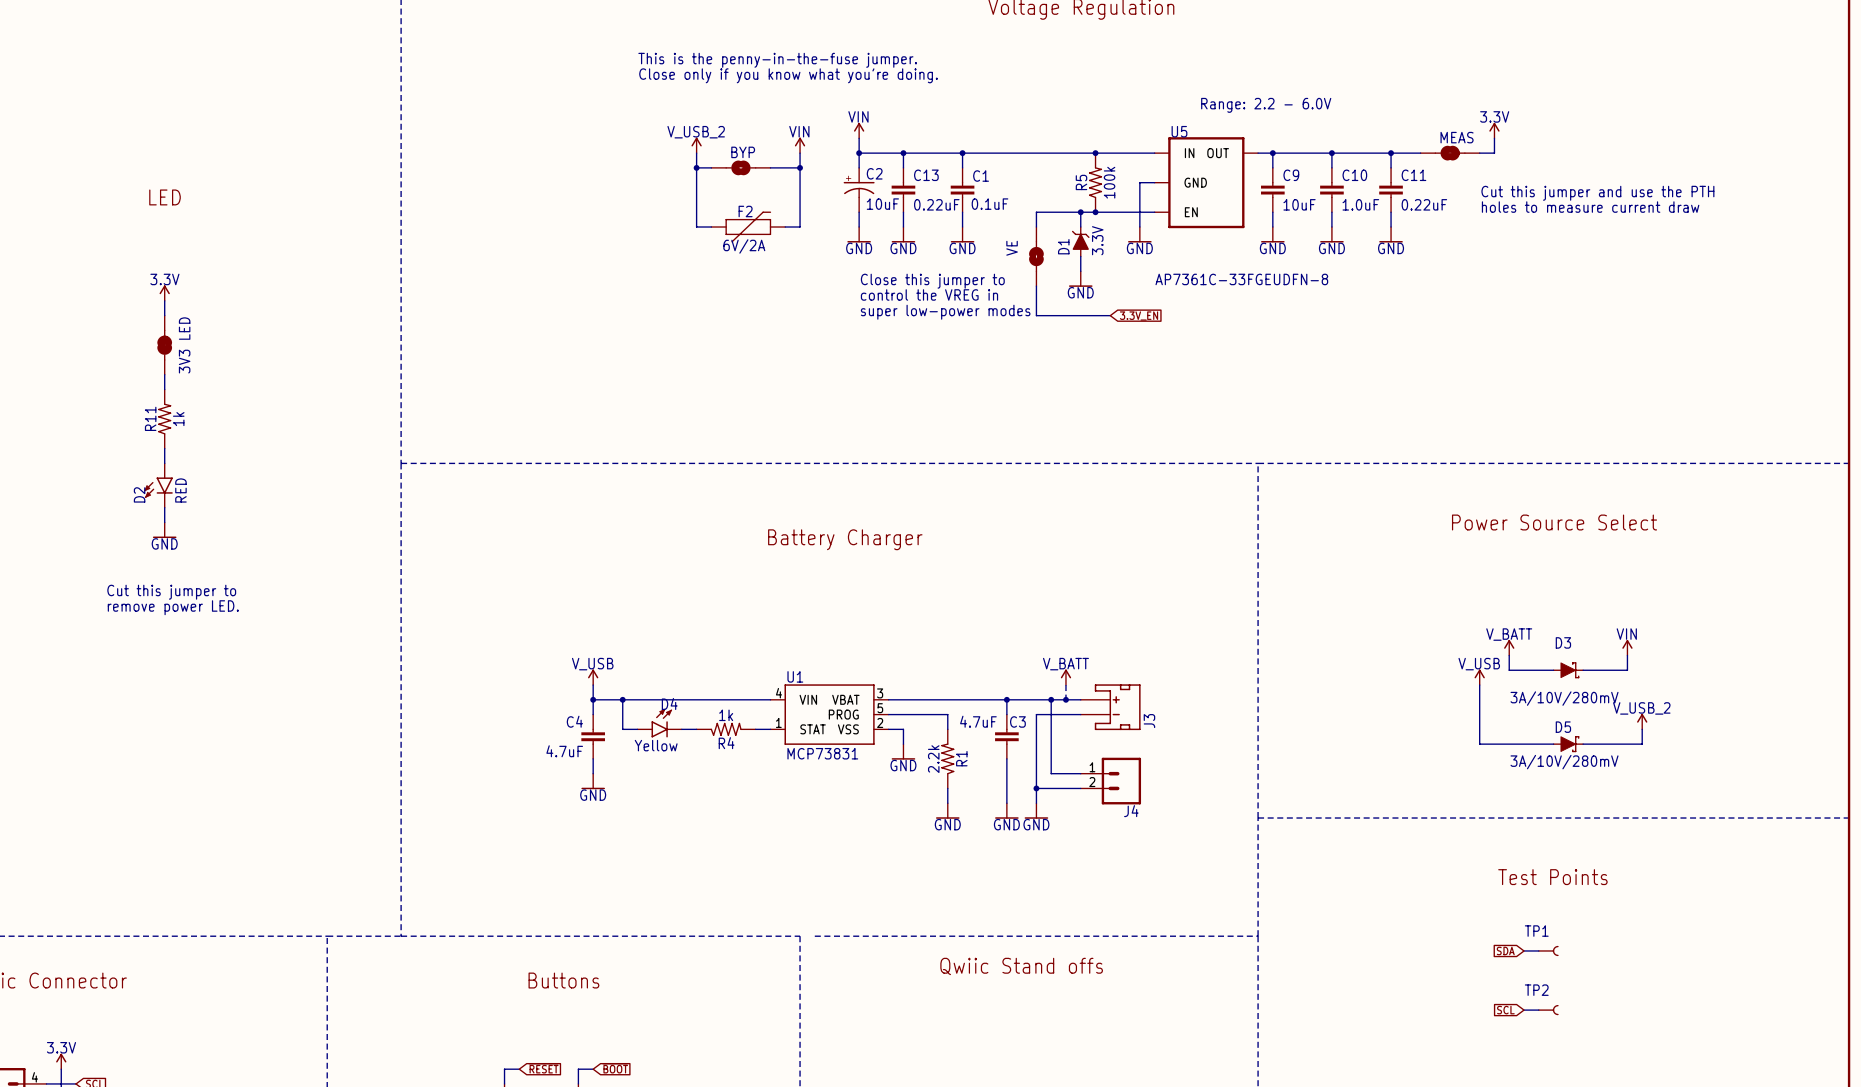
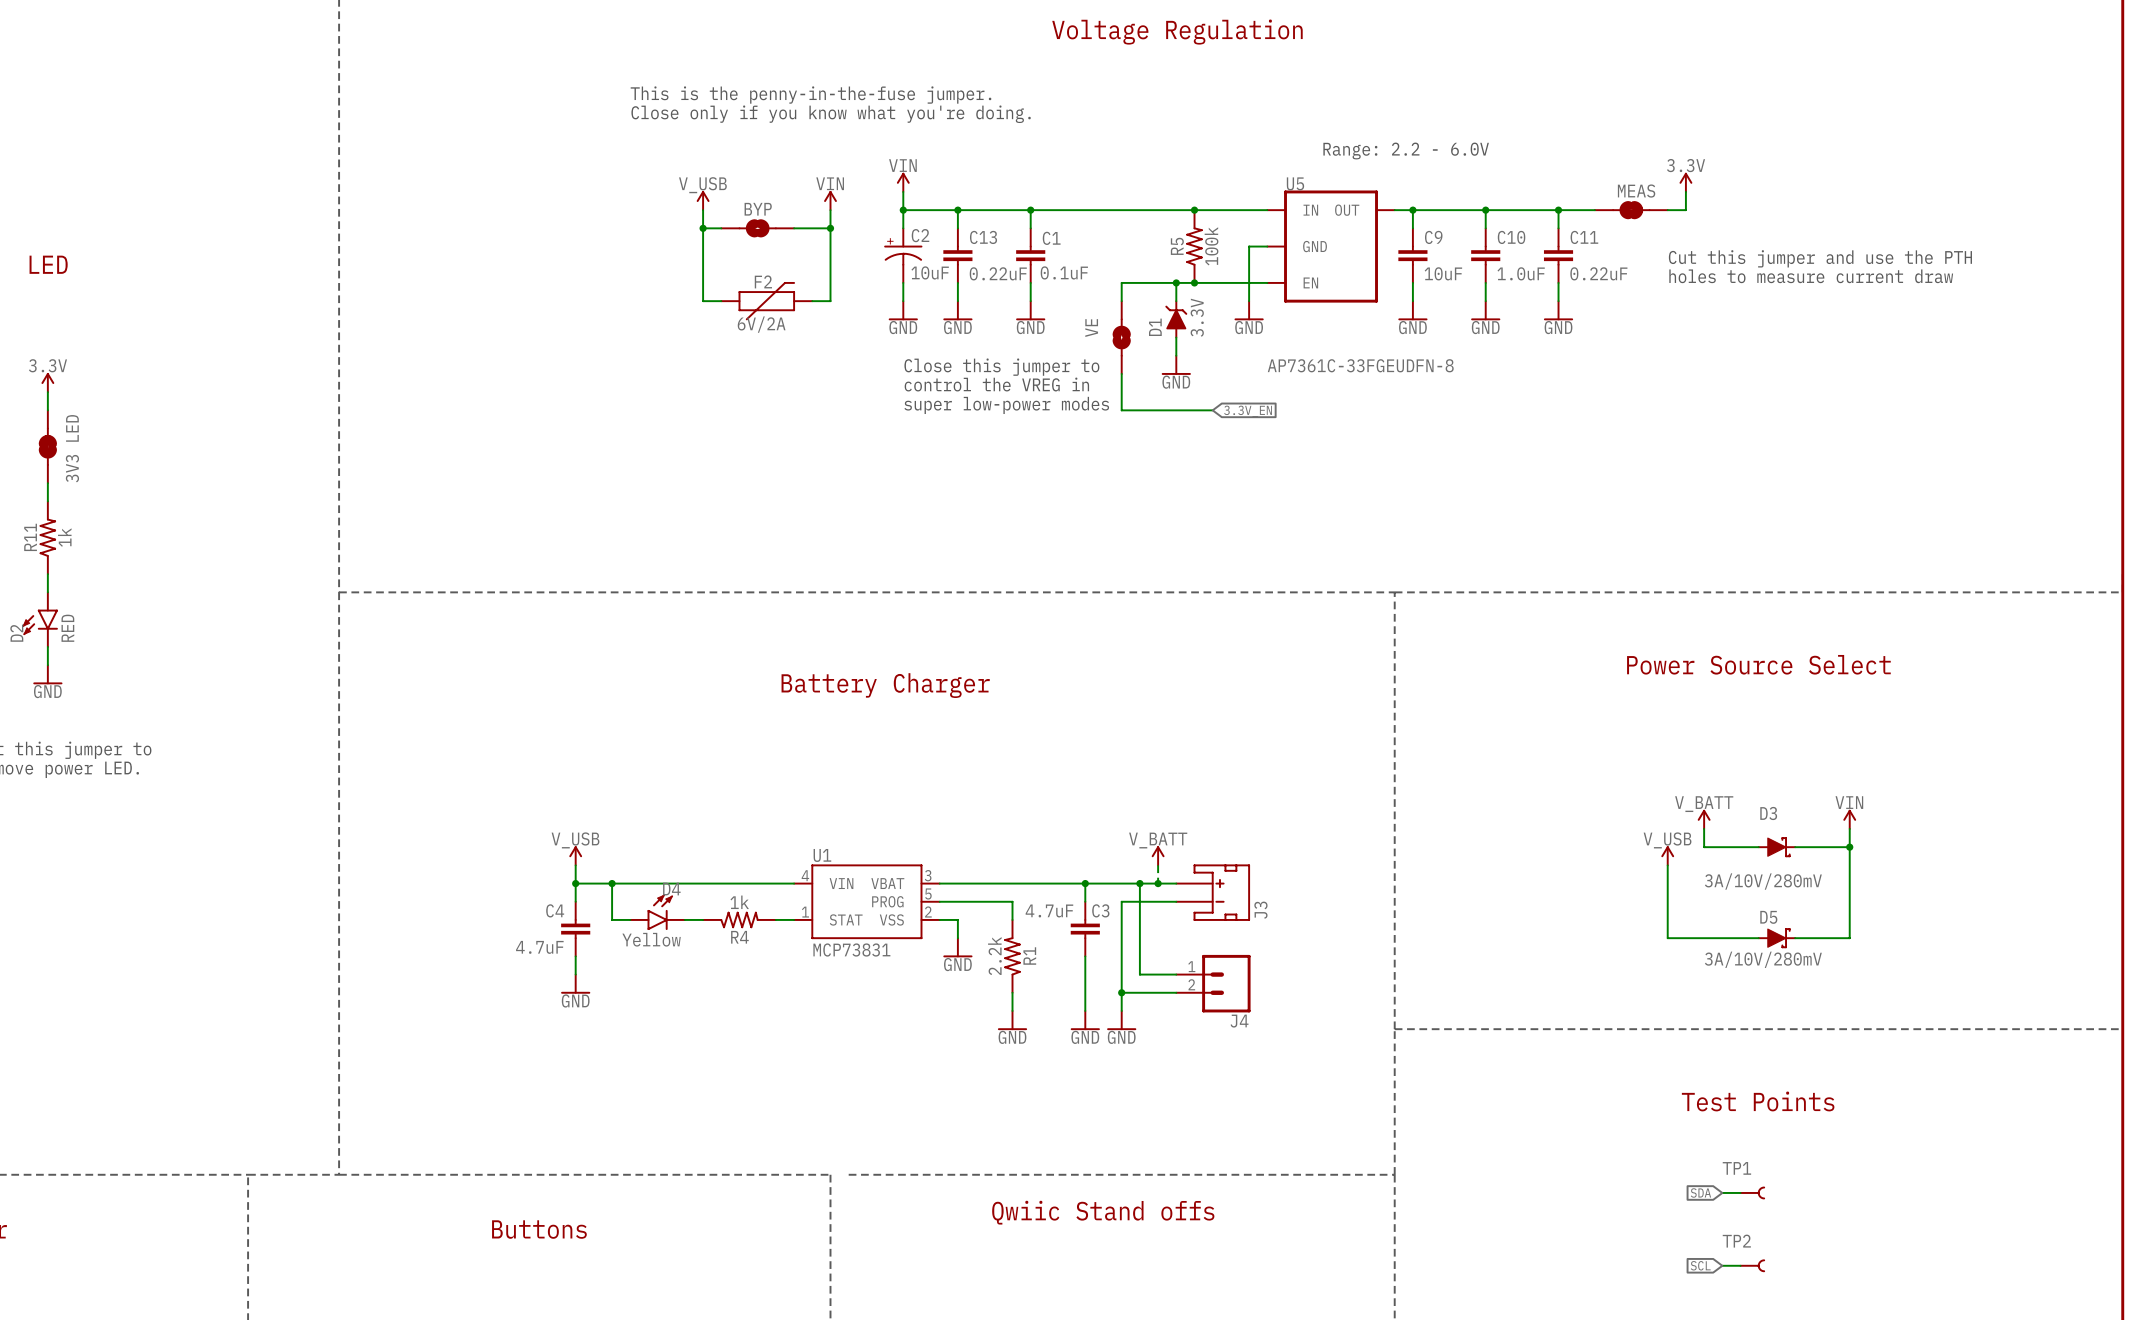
power symbol: V_USB_2 (696, 145) -> V_USB (703, 200)
junction: none -> (1849, 847)
power symbol: V_USB_2 (1642, 721) -> none
wire: (1642, 729) (1642, 744) (1627, 744) -> (1849, 847) (1849, 938)

